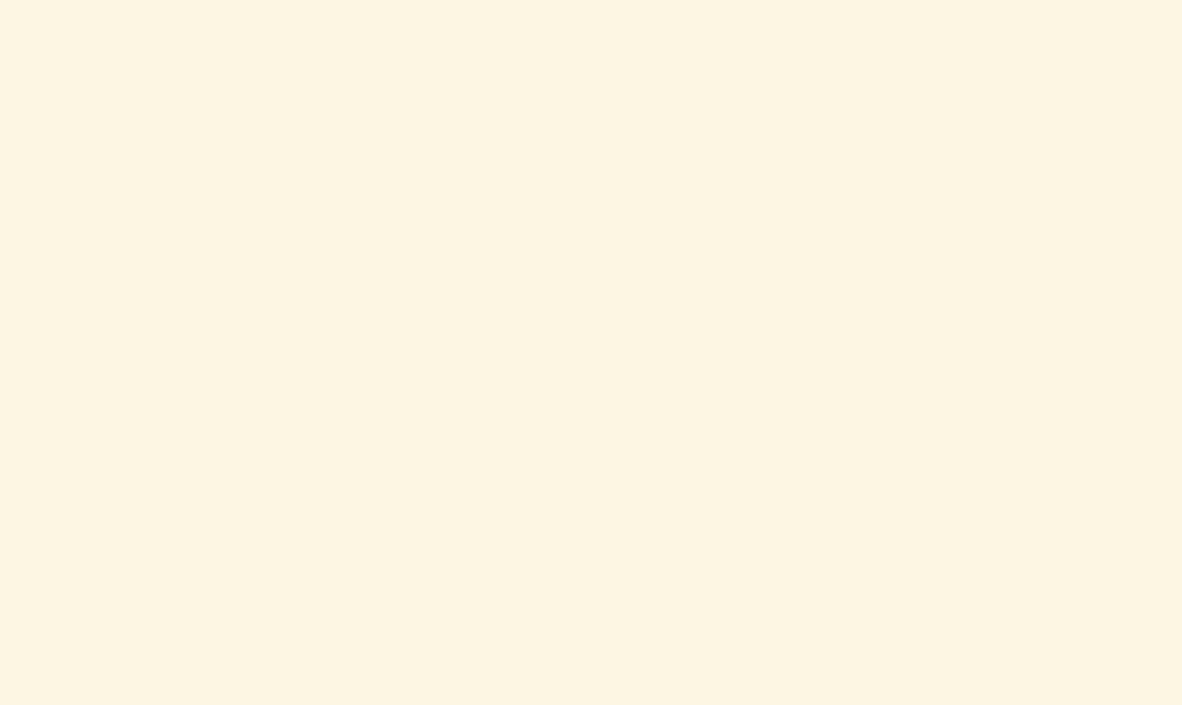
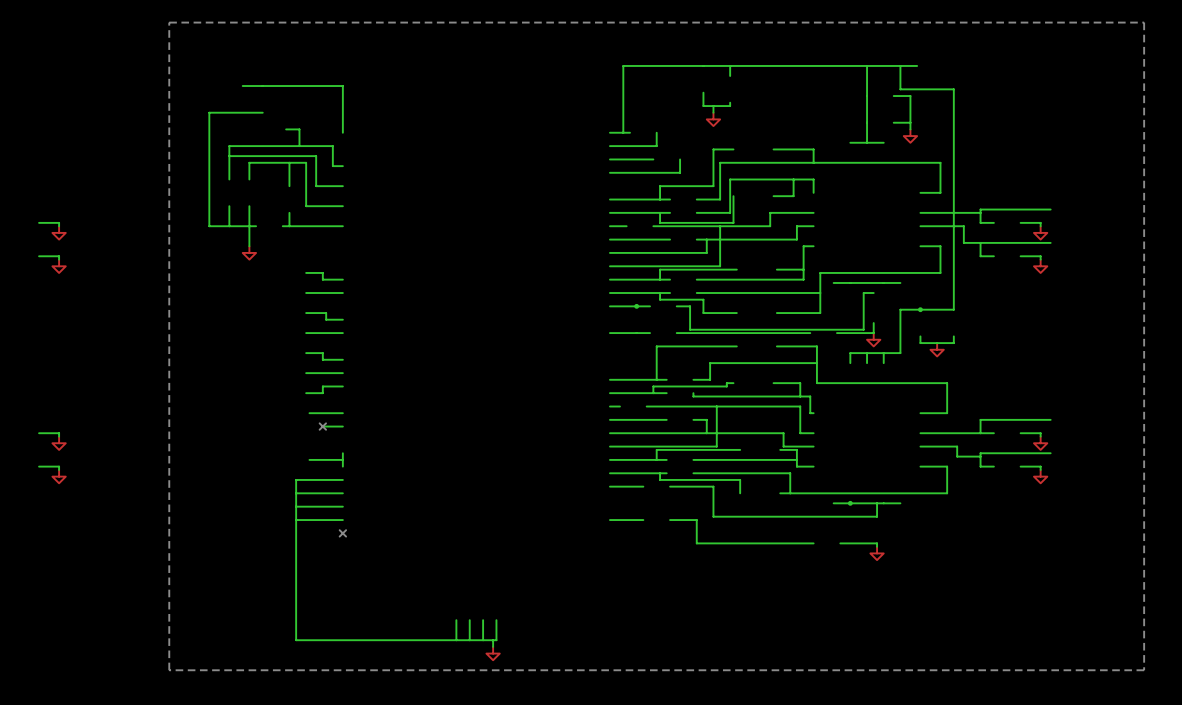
line: none -> (169, 22) (169, 670) (1144, 670) (1144, 22) (169, 22)
wire: none -> (730, 65) (730, 75)
wire: none -> (867, 65) (867, 142)
wire: none -> (900, 65) (900, 89) (953, 89) (953, 309) (900, 309) (900, 353) (850, 353) (850, 363)
wire: none -> (917, 65) (623, 65) (623, 132)
wire: none -> (242, 86) (342, 86) (342, 132)
wire: none -> (703, 92) (703, 106) (730, 106) (730, 102)
wire: none -> (893, 96) (910, 96) (910, 129)
wire: none -> (713, 106) (713, 112)
wire: none -> (262, 112) (209, 112) (209, 226) (256, 226)
power symbol: none -> (713, 119)
wire: none -> (893, 122) (910, 122)
wire: none -> (286, 129) (299, 129) (299, 146)
wire: none -> (609, 132) (629, 132)
wire: none -> (656, 132) (656, 146) (609, 146)
power symbol: none -> (910, 136)
wire: none -> (850, 142) (883, 142)
wire: none -> (733, 149) (713, 149) (713, 186) (660, 186) (660, 199)
wire: none -> (773, 149) (813, 149) (813, 162)
wire: none -> (229, 156) (316, 156) (316, 186) (342, 186)
wire: none -> (609, 159) (653, 159)
wire: none -> (680, 159) (680, 172) (609, 172)
wire: none -> (289, 162) (289, 186)
wire: none -> (342, 166) (332, 166) (332, 146) (229, 146) (229, 179)
wire: none -> (249, 179) (249, 162) (306, 162) (306, 206) (342, 206)
wire: none -> (793, 179) (793, 196) (773, 196)
wire: none -> (813, 192) (813, 179) (730, 179) (730, 212) (696, 212)
wire: none -> (920, 192) (940, 192) (940, 162) (720, 162) (720, 199) (696, 199)
wire: none -> (733, 196) (733, 222) (660, 222) (660, 212)
wire: none -> (609, 199) (670, 199)
wire: none -> (229, 206) (229, 226)
wire: none -> (249, 206) (249, 246)
wire: none -> (1050, 209) (980, 209) (980, 222) (993, 222)
wire: none -> (289, 212) (289, 226)
wire: none -> (609, 212) (670, 212)
wire: none -> (813, 212) (770, 212) (770, 226) (653, 226)
wire: none -> (920, 212) (980, 212)
wire: none -> (39, 222) (59, 222) (59, 226)
wire: none -> (1020, 222) (1040, 222) (1040, 226)
wire: none -> (282, 226) (342, 226)
wire: none -> (609, 226) (626, 226)
wire: none -> (720, 226) (720, 266) (609, 266)
wire: none -> (813, 226) (796, 226) (796, 239) (696, 239)
wire: none -> (920, 226) (963, 226) (963, 242) (1050, 242)
power symbol: none -> (59, 232)
power symbol: none -> (1040, 232)
wire: none -> (609, 239) (670, 239)
wire: none -> (706, 239) (706, 252) (609, 252)
wire: none -> (980, 242) (980, 256) (993, 256)
wire: none -> (813, 246) (803, 246) (803, 279) (696, 279)
wire: none -> (920, 246) (940, 246) (940, 272) (820, 272) (820, 313) (776, 313)
power symbol: none -> (249, 252)
wire: none -> (39, 256) (59, 256) (59, 259)
wire: none -> (1020, 256) (1040, 256) (1040, 259)
power symbol: none -> (59, 266)
power symbol: none -> (1040, 266)
wire: none -> (736, 269) (660, 269) (660, 279)
wire: none -> (776, 269) (803, 269)
wire: none -> (306, 272) (322, 272) (322, 279) (342, 279)
wire: none -> (609, 279) (670, 279)
wire: none -> (833, 282) (900, 282)
wire: none -> (306, 293) (342, 293)
wire: none -> (609, 293) (670, 293)
wire: none -> (660, 293) (660, 299) (703, 299) (703, 313) (736, 313)
wire: none -> (696, 293) (820, 293)
wire: none -> (873, 293) (863, 293) (863, 329) (690, 329) (690, 306) (676, 306)
wire: none -> (609, 306) (650, 306)
junction: none -> (636, 306)
junction: none -> (920, 309)
wire: none -> (306, 313) (326, 313) (326, 319) (342, 319)
wire: none -> (873, 323) (873, 333) (836, 333)
wire: none -> (306, 333) (342, 333)
wire: none -> (609, 333) (650, 333)
wire: none -> (676, 333) (810, 333)
wire: none -> (920, 336) (920, 343) (953, 343) (953, 336)
power symbol: none -> (873, 339)
wire: none -> (736, 346) (656, 346) (656, 379)
wire: none -> (776, 346) (816, 346) (816, 383) (947, 383) (947, 413) (920, 413)
power symbol: none -> (937, 349)
wire: none -> (306, 353) (322, 353) (322, 359) (342, 359)
wire: none -> (867, 353) (867, 363)
wire: none -> (883, 353) (883, 363)
wire: none -> (816, 363) (710, 363) (710, 379) (693, 379)
wire: none -> (306, 373) (342, 373)
wire: none -> (609, 379) (666, 379)
wire: none -> (733, 383) (726, 383) (726, 386) (653, 386) (653, 393)
wire: none -> (773, 383) (800, 383) (800, 396)
wire: none -> (342, 386) (322, 386) (322, 393) (306, 393)
wire: none -> (609, 393) (666, 393)
wire: none -> (693, 393) (693, 396) (810, 396) (810, 413) (813, 413)
wire: none -> (609, 406) (619, 406)
wire: none -> (646, 406) (800, 406) (800, 433) (813, 433)
wire: none -> (716, 406) (716, 446) (609, 446)
wire: none -> (309, 413) (342, 413)
wire: none -> (609, 419) (666, 419)
wire: none -> (693, 419) (706, 419) (706, 433)
wire: none -> (1050, 419) (980, 419) (980, 433)
wire: none -> (322, 426) (342, 426)
no-connect mark: none -> (322, 426)
wire: none -> (39, 433) (59, 433) (59, 436)
wire: none -> (609, 433) (783, 433) (783, 446) (813, 446)
wire: none -> (920, 433) (993, 433)
wire: none -> (1020, 433) (1040, 433) (1040, 436)
power symbol: none -> (59, 443)
power symbol: none -> (1040, 443)
wire: none -> (920, 446) (957, 446) (957, 456) (980, 456)
wire: none -> (740, 449) (656, 449) (656, 459)
wire: none -> (780, 449) (796, 449) (796, 466) (813, 466)
wire: none -> (342, 453) (342, 466)
wire: none -> (1050, 453) (980, 453) (980, 466) (993, 466)
wire: none -> (309, 459) (342, 459)
wire: none -> (609, 459) (666, 459)
wire: none -> (693, 459) (796, 459)
wire: none -> (39, 466) (59, 466) (59, 469)
wire: none -> (920, 466) (947, 466) (947, 493) (780, 493)
wire: none -> (1020, 466) (1040, 466) (1040, 469)
wire: none -> (609, 473) (666, 473)
wire: none -> (660, 473) (660, 479) (740, 479) (740, 493)
wire: none -> (693, 473) (790, 473) (790, 493)
power symbol: none -> (59, 476)
power symbol: none -> (1040, 476)
wire: none -> (342, 479) (296, 479) (296, 640) (496, 640) (496, 620)
wire: none -> (609, 486) (643, 486)
wire: none -> (670, 486) (713, 486) (713, 516) (877, 516) (877, 503)
wire: none -> (296, 493) (342, 493)
wire: none -> (833, 503) (900, 503)
junction: none -> (850, 503)
wire: none -> (296, 506) (342, 506)
wire: none -> (296, 520) (342, 520)
wire: none -> (609, 520) (643, 520)
wire: none -> (670, 520) (696, 520) (696, 543) (813, 543)
no-connect mark: none -> (342, 533)
wire: none -> (840, 543) (877, 543) (877, 546)
power symbol: none -> (877, 553)
wire: none -> (456, 620) (456, 640)
wire: none -> (469, 620) (469, 640)
wire: none -> (483, 620) (483, 640)
wire: none -> (493, 640) (493, 646)
power symbol: none -> (493, 653)

